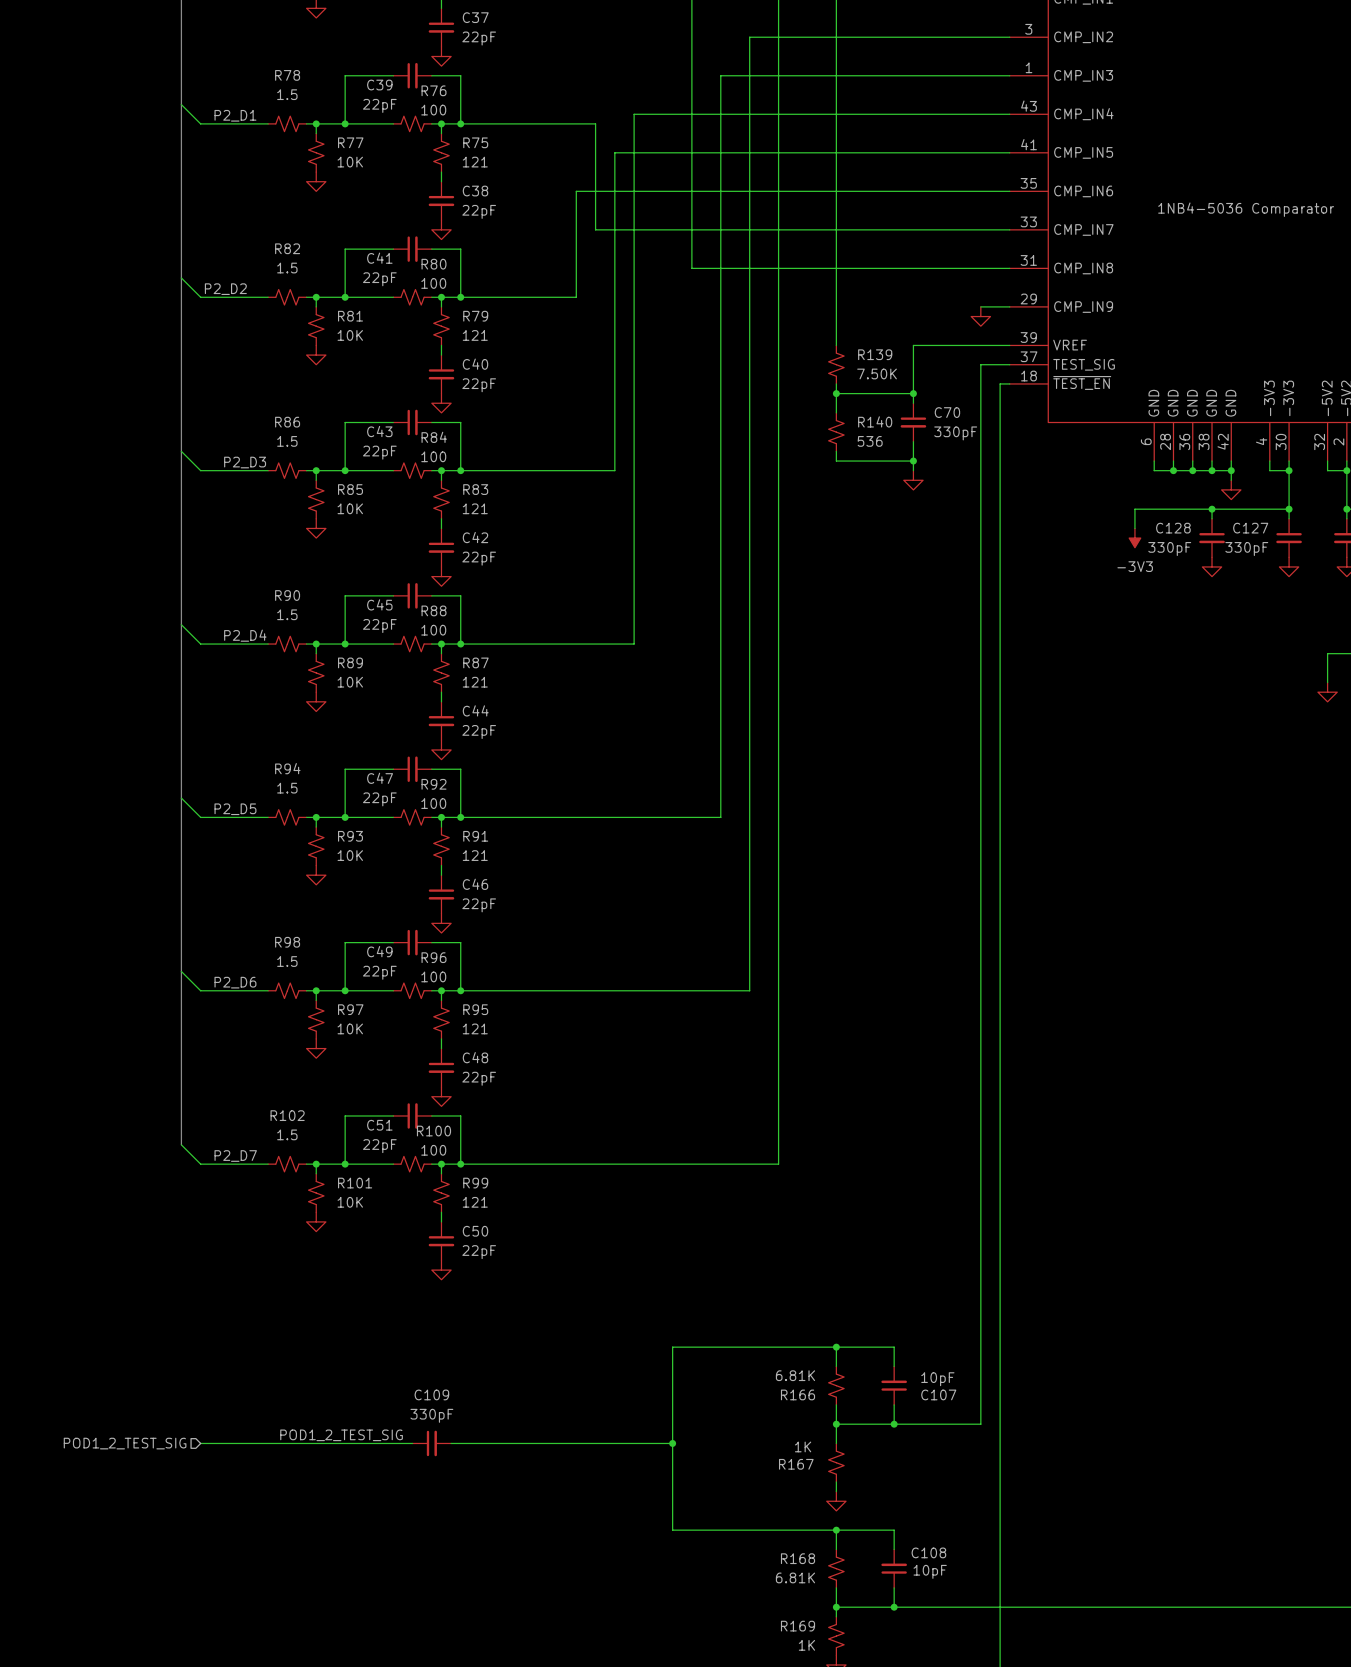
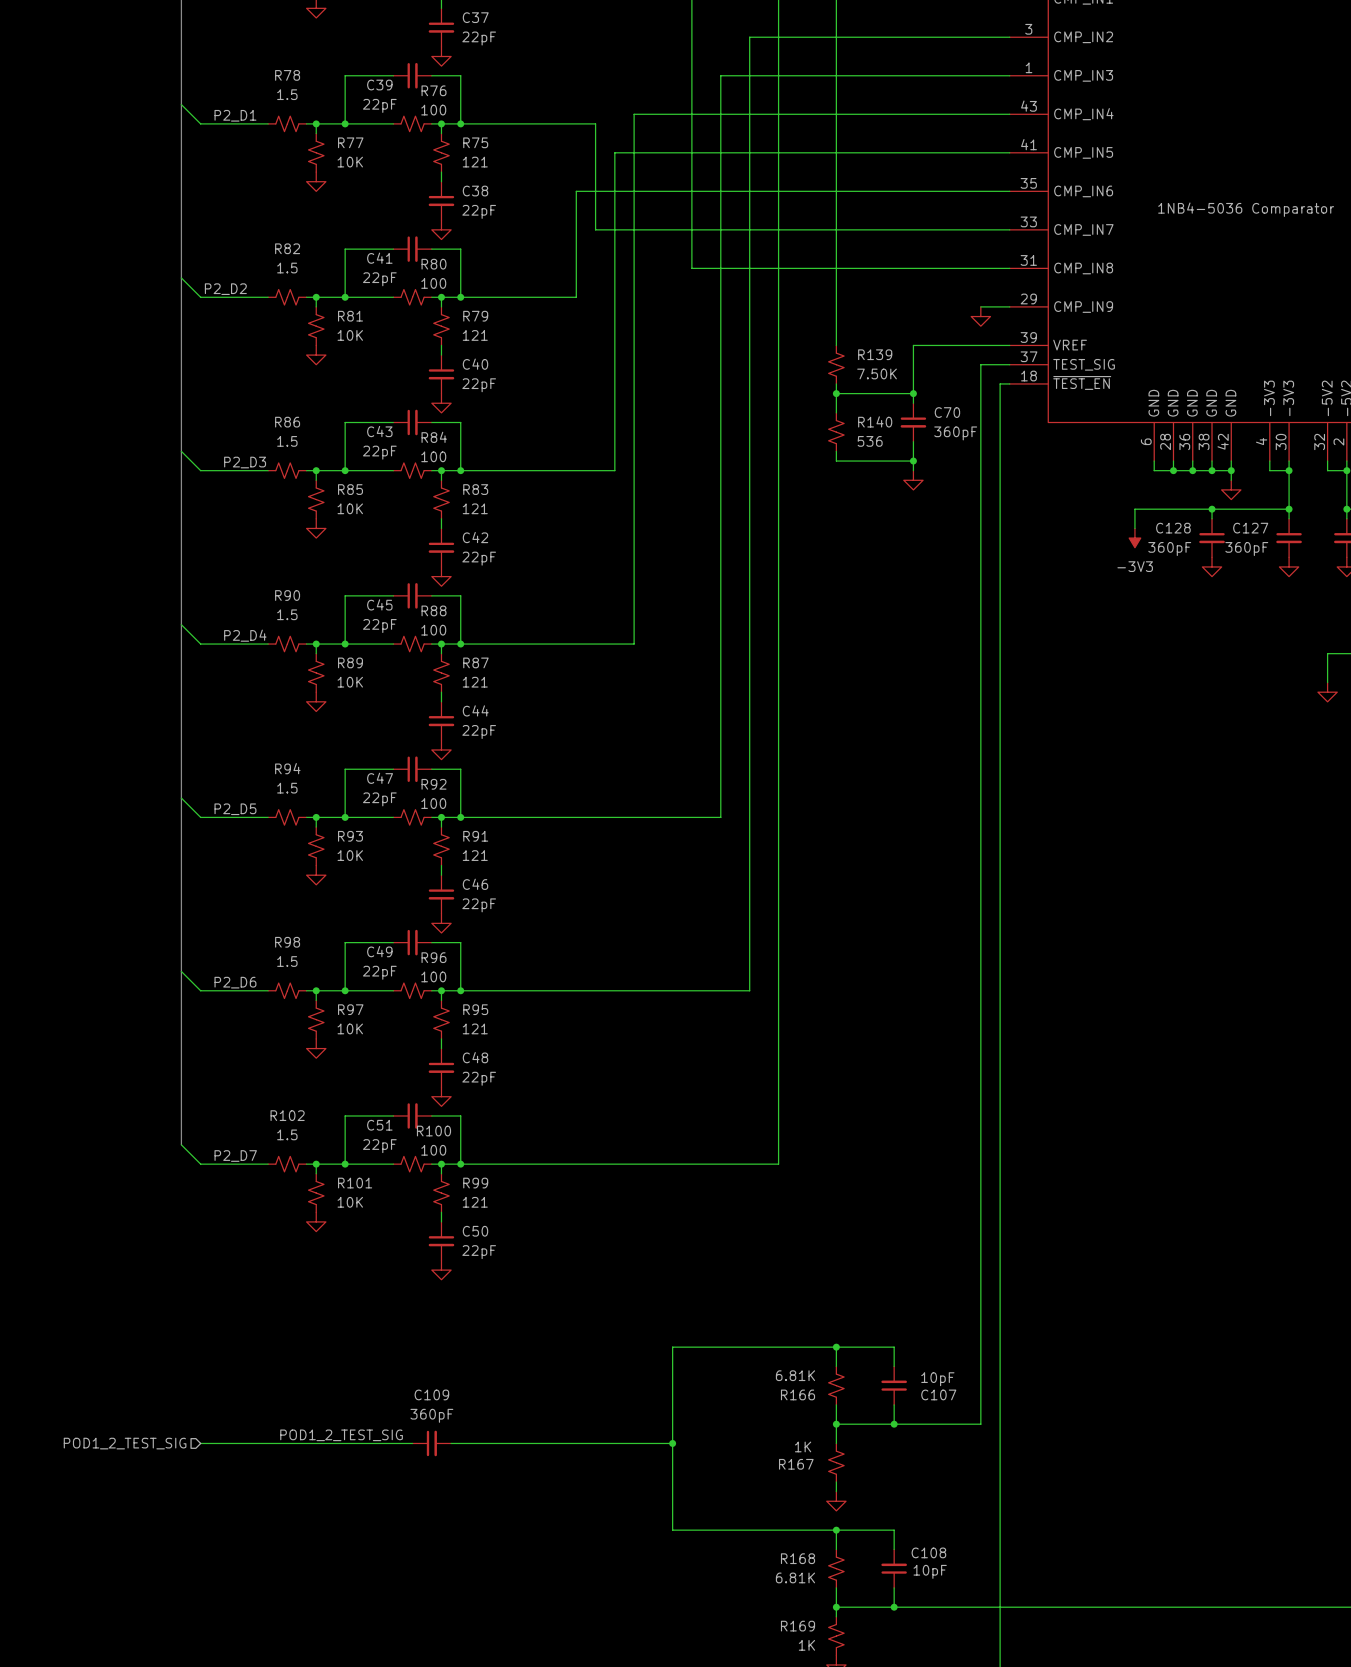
C70 value: 330pF (955, 433) -> 360pF (955, 433)
C128 value: 330pF (1169, 549) -> 360pF (1169, 549)
C127 value: 330pF (1246, 549) -> 360pF (1246, 549)
C109 value: 330pF (431, 1415) -> 360pF (431, 1415)

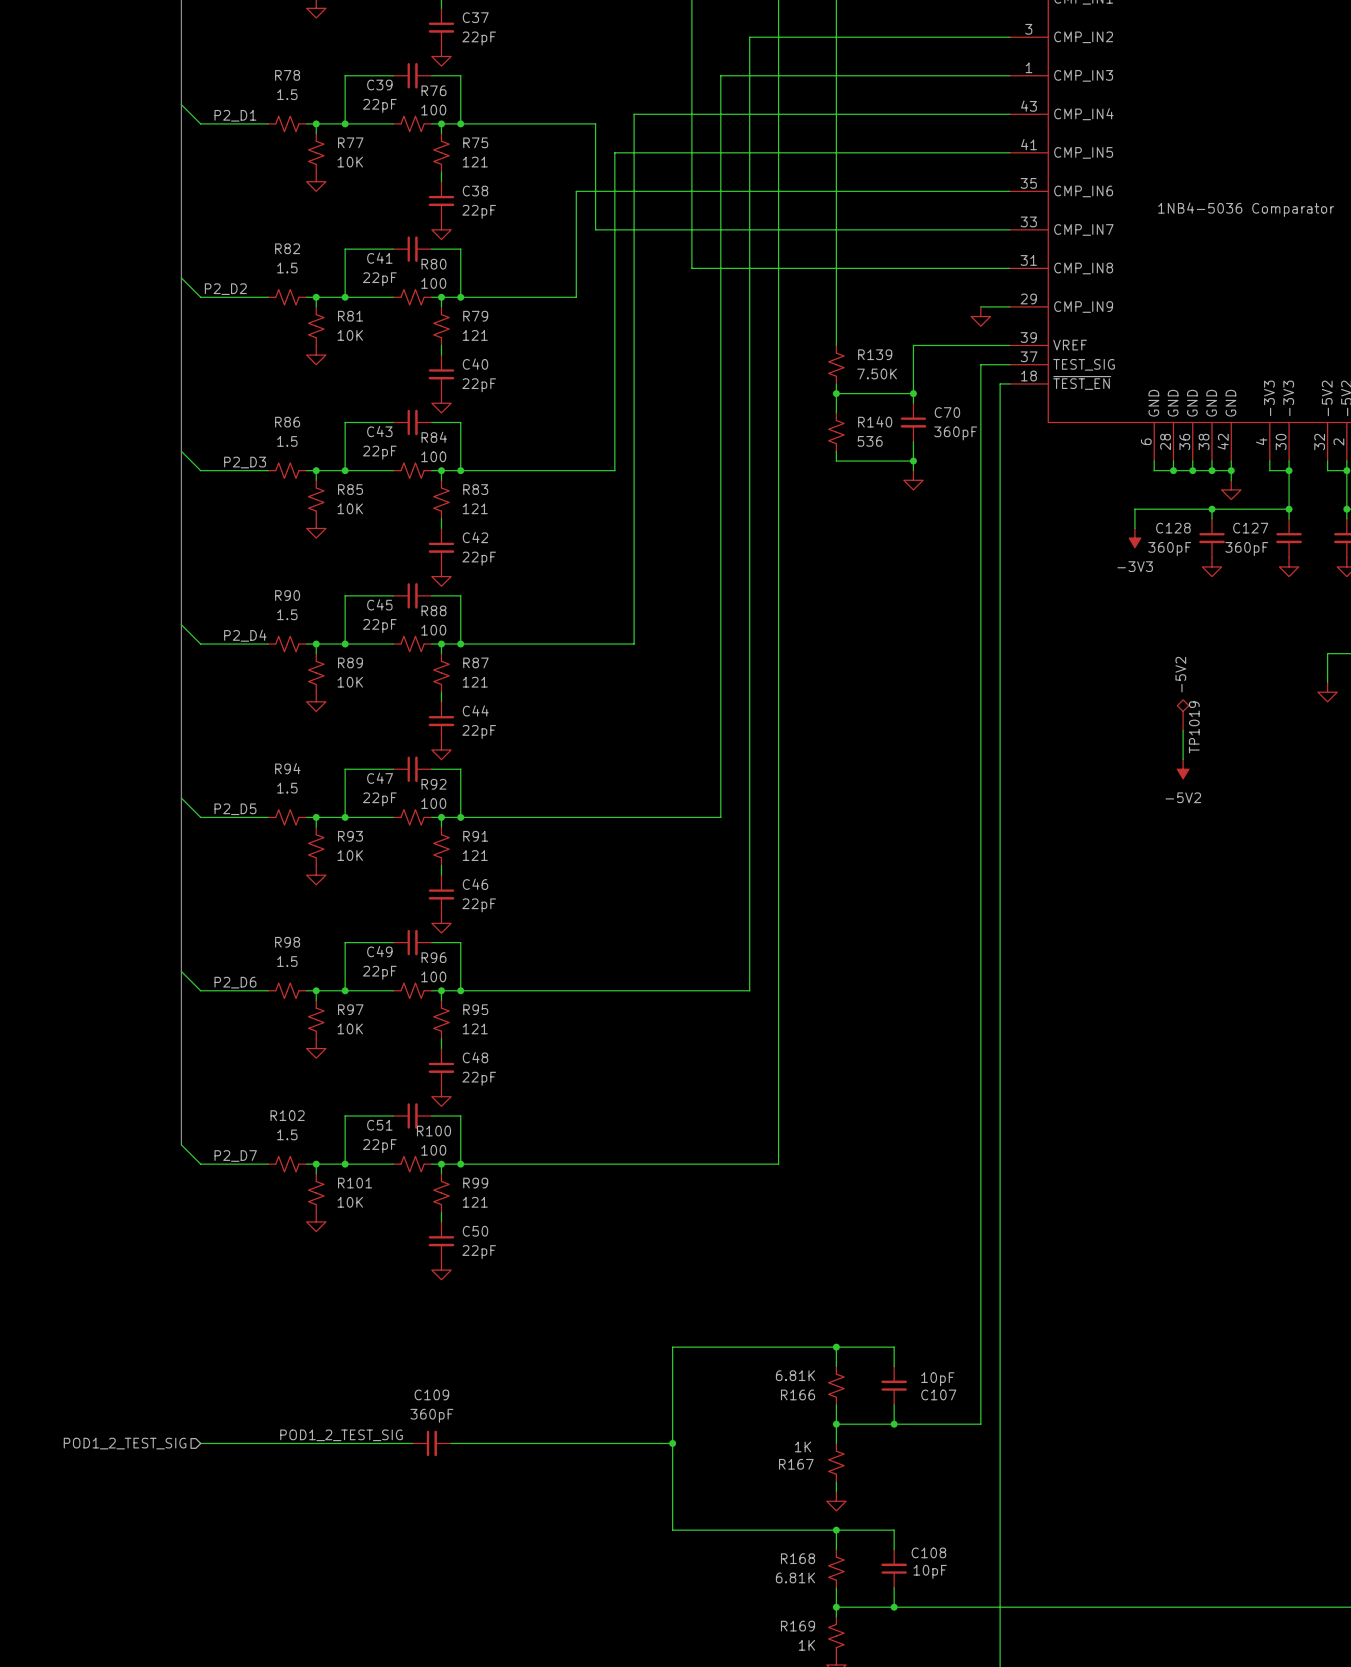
TP1019: none -> -5V2 (1183, 715)
wire: none -> (1183, 730) (1183, 759)
power symbol: none -> -5V2 (1183, 769)

